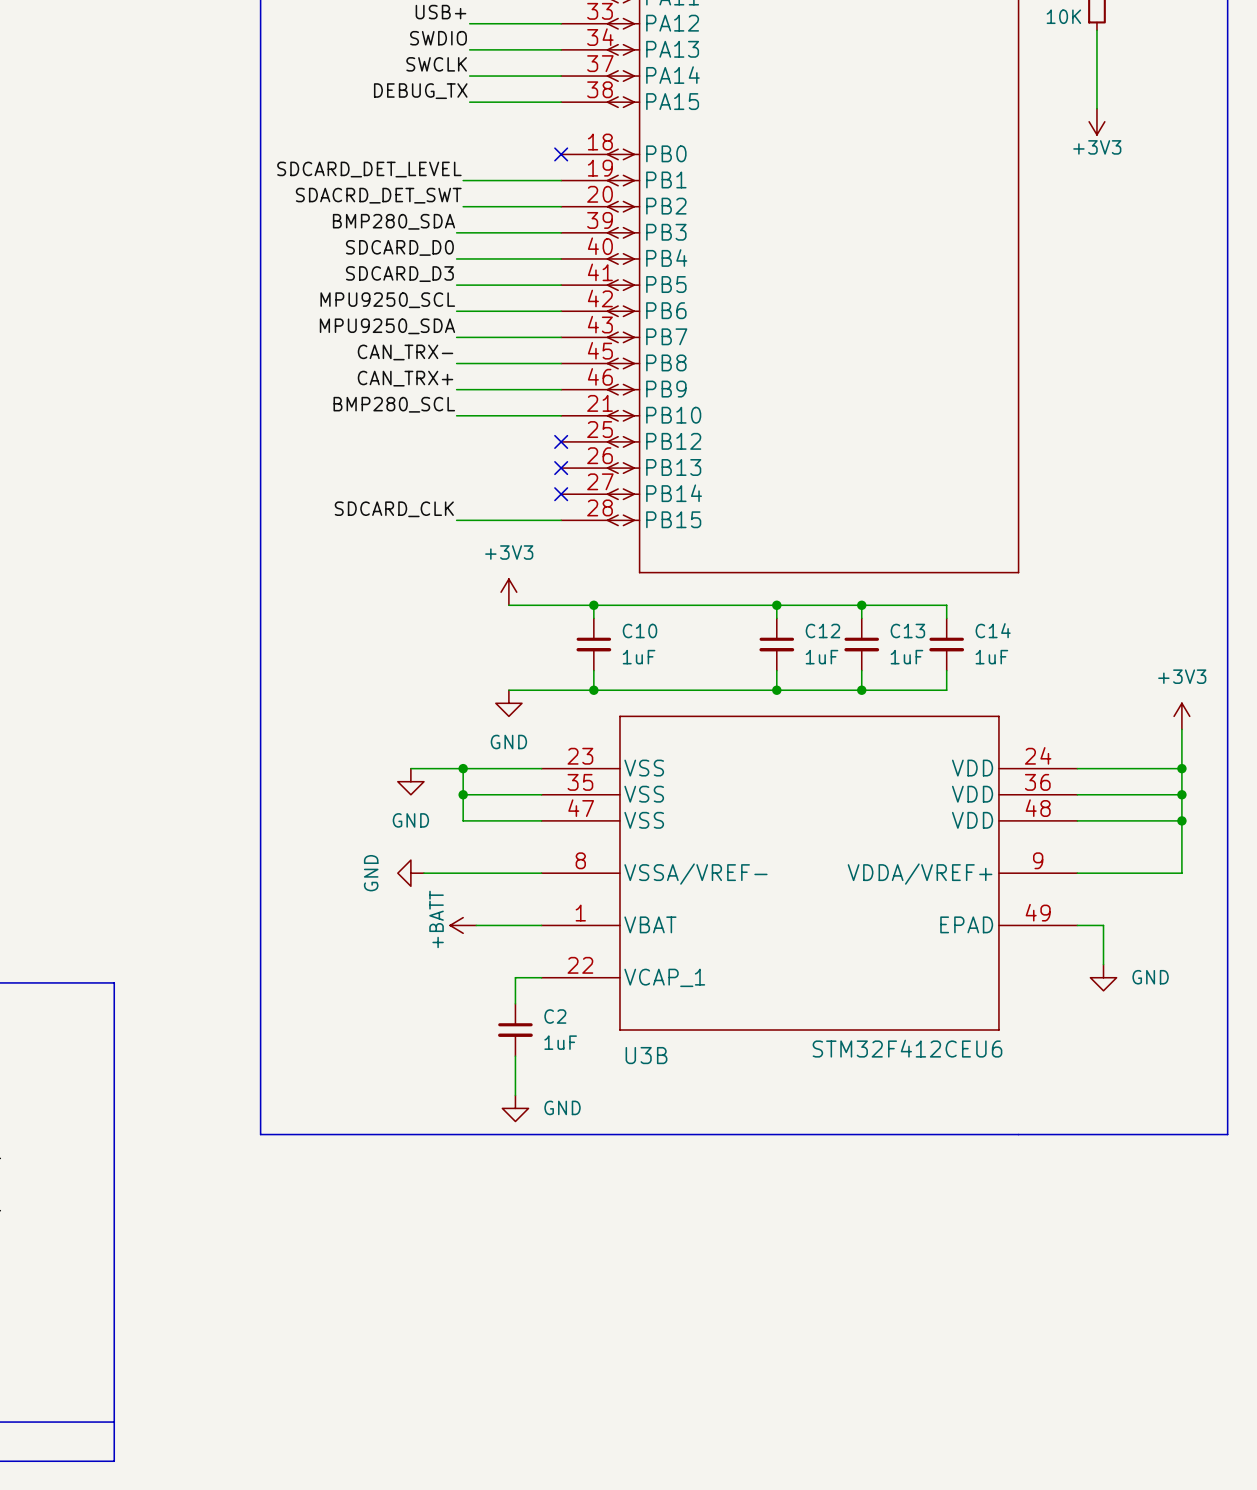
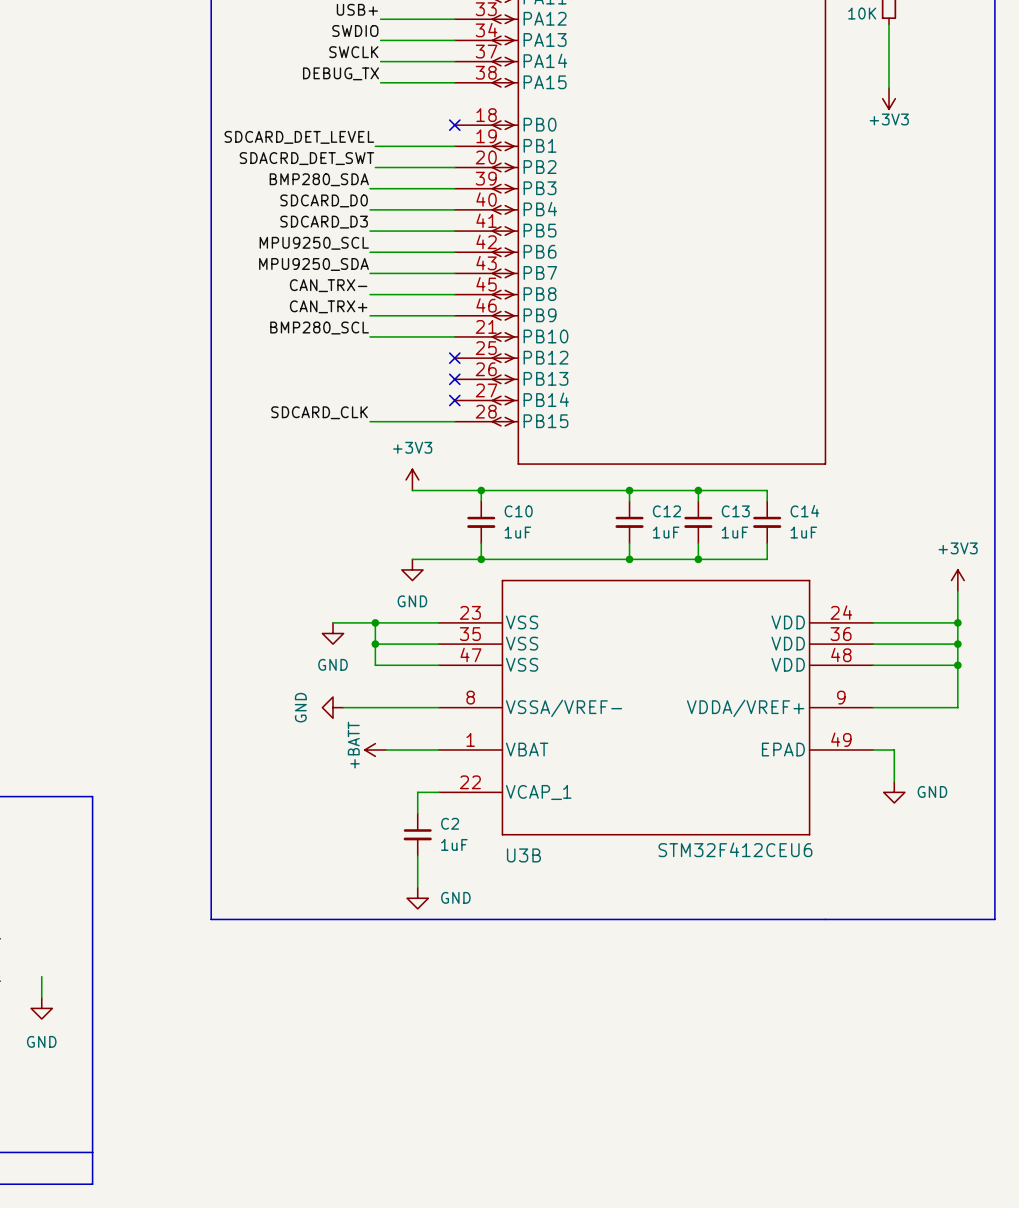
wire: none -> (41, 976) (41, 997)
power symbol: none -> GND (41, 1008)

